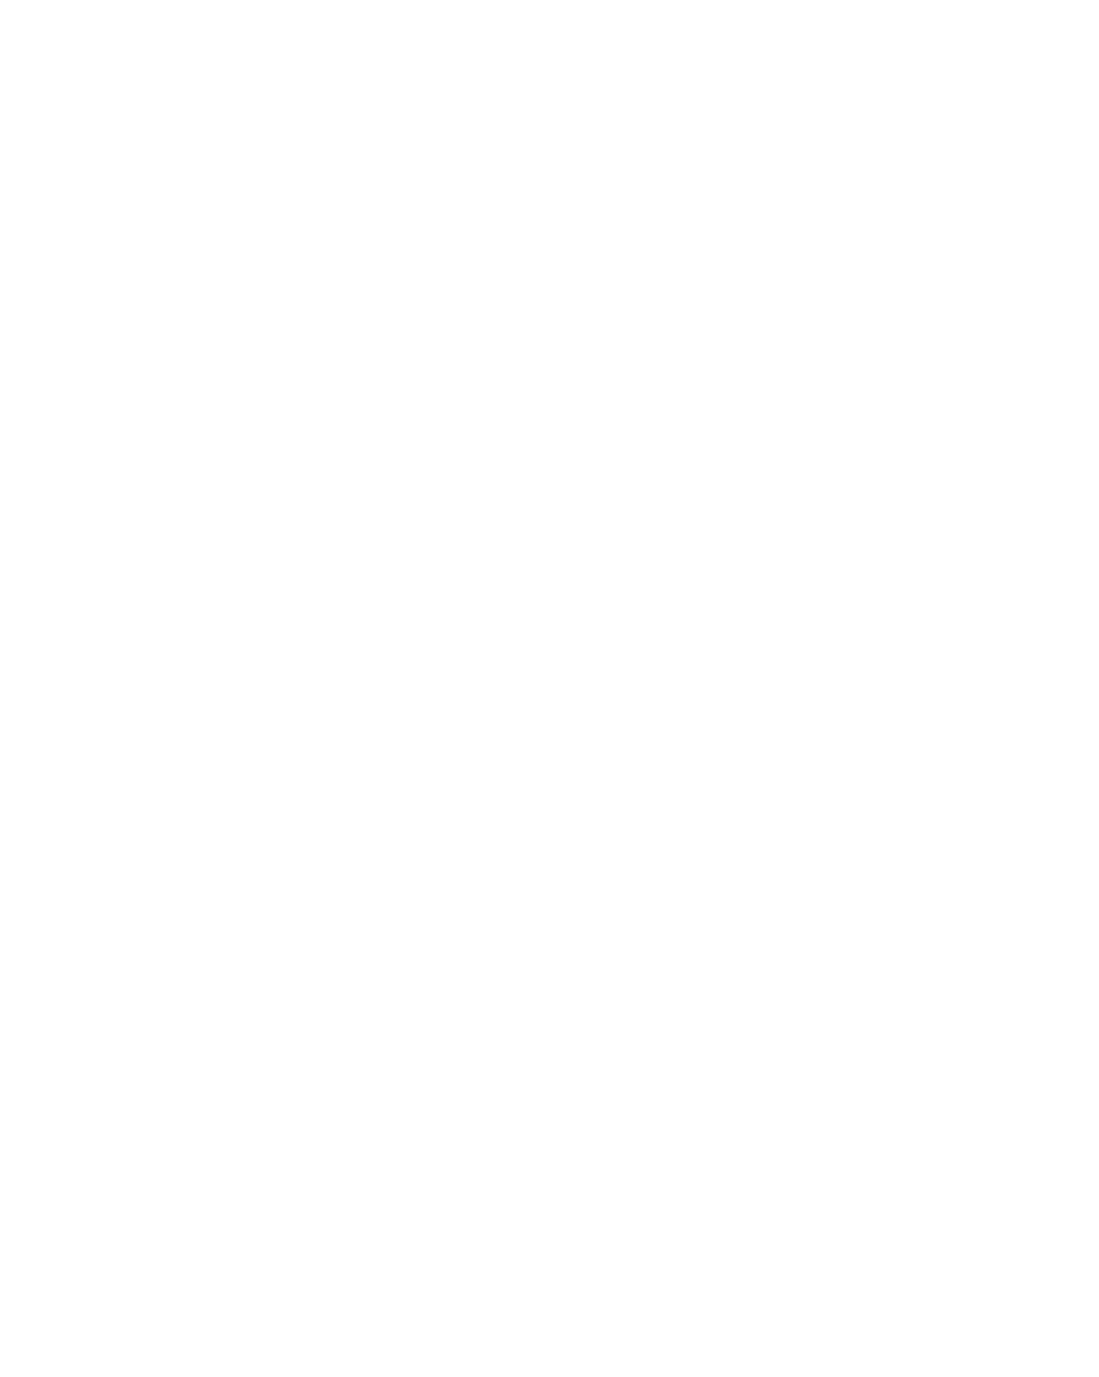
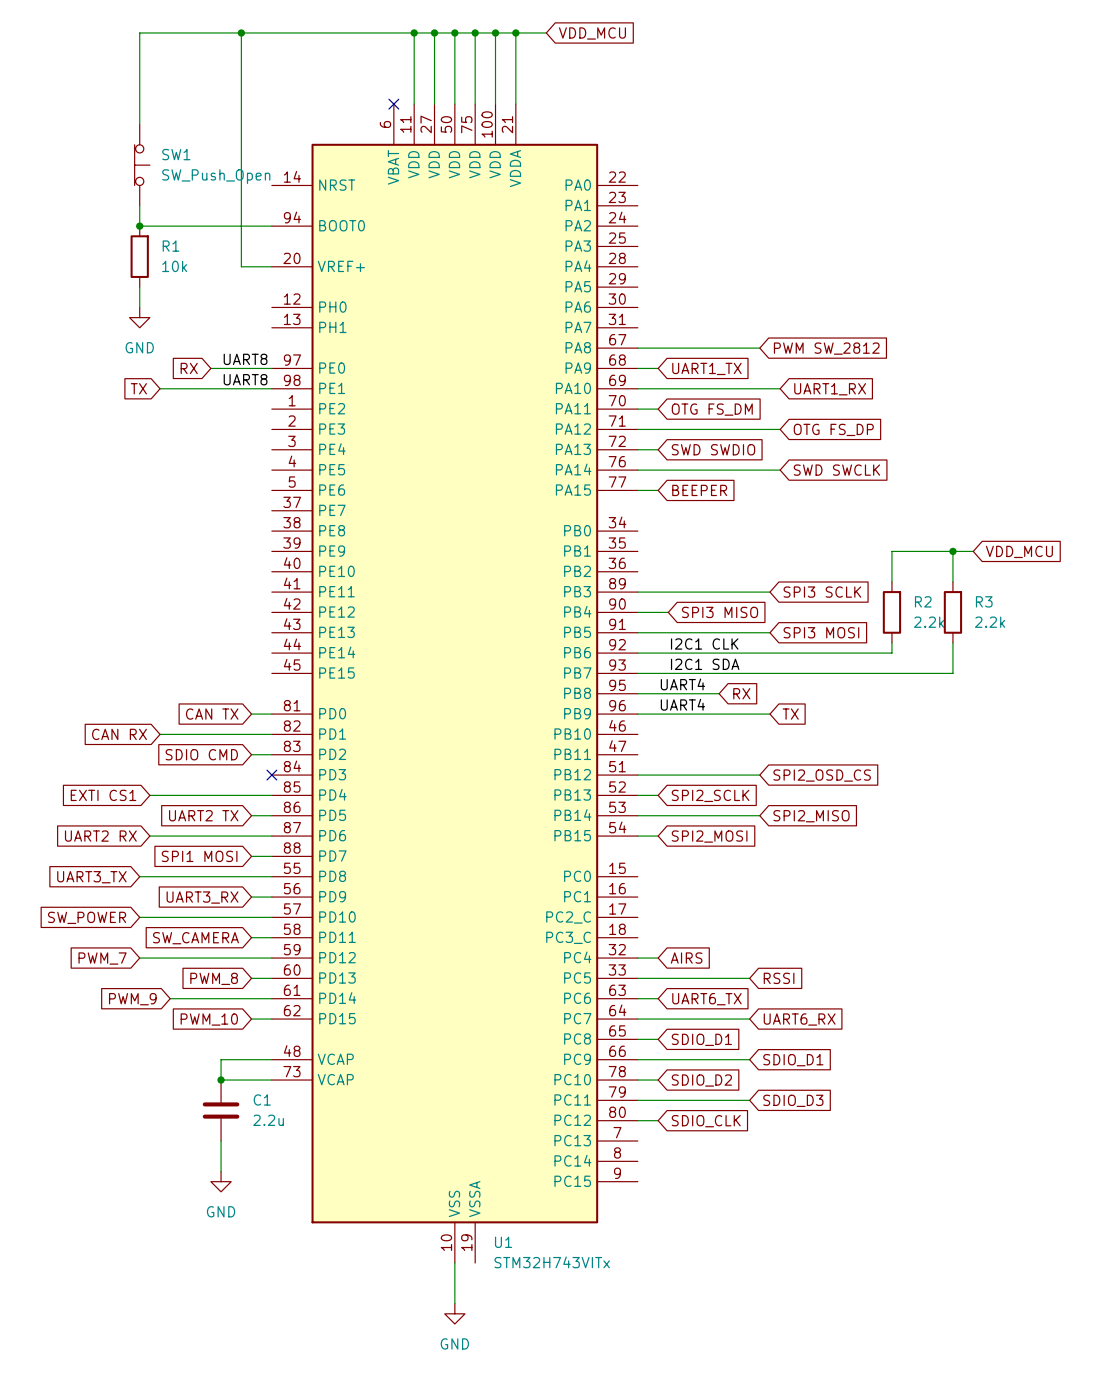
wire: none -> (241, 32) (241, 266) (271, 266)
junction: none -> (241, 32)
wire: none -> (414, 32) (414, 104)
junction: none -> (414, 32)
wire: none -> (434, 32) (434, 104)
junction: none -> (434, 32)
wire: none -> (454, 32) (454, 104)
junction: none -> (454, 32)
wire: none -> (475, 32) (475, 104)
junction: none -> (475, 32)
wire: none -> (495, 32) (495, 104)
junction: none -> (495, 32)
wire: none -> (515, 32) (515, 104)
junction: none -> (515, 32)
wire: none -> (546, 32) (139, 32) (139, 124)
global label: none -> VDD_MCU (592, 33)
no-connect mark: none -> (393, 104)
SW1: none -> SW_Push_Open (142, 165)
wire: none -> (139, 205) (139, 226) (271, 226)
junction: none -> (139, 226)
R1: none -> 10k (139, 256)
wire: none -> (139, 287) (139, 307)
power symbol: none -> GND (139, 317)
wire: none -> (637, 348) (759, 348)
global label: none -> PWM SW_2812 (826, 348)
label: none -> UART8 (245, 359)
global label: none -> RX (189, 368)
wire: none -> (210, 368) (271, 368)
wire: none -> (637, 368) (658, 368)
global label: none -> UART1_TX (706, 368)
label: none -> UART8 (245, 379)
global label: none -> TX (138, 388)
wire: none -> (160, 388) (271, 388)
wire: none -> (637, 388) (780, 388)
global label: none -> UART1_RX (830, 389)
wire: none -> (637, 409) (658, 409)
global label: none -> OTG FS_DM (712, 409)
wire: none -> (637, 429) (780, 429)
global label: none -> OTG FS_DP (833, 429)
wire: none -> (637, 449) (658, 449)
global label: none -> SWD SWDIO (713, 449)
wire: none -> (637, 470) (780, 470)
global label: none -> SWD SWCLK (836, 470)
wire: none -> (637, 490) (658, 490)
global label: none -> BEEPER (699, 490)
wire: none -> (952, 551) (952, 581)
junction: none -> (952, 551)
wire: none -> (973, 551) (891, 551) (891, 581)
global label: none -> VDD_MCU (1019, 551)
wire: none -> (637, 592) (769, 592)
global label: none -> SPI3 SCLK (822, 592)
wire: none -> (637, 612) (668, 612)
global label: none -> SPI3 MISO (720, 612)
R2: none -> 2.2k (891, 612)
R3: none -> 2.2k (952, 612)
wire: none -> (637, 632) (769, 632)
global label: none -> SPI3 MOSI (821, 632)
wire: none -> (891, 642) (891, 653) (637, 653)
wire: none -> (952, 642) (952, 673) (637, 673)
label: none -> I2C1 CLK (704, 644)
label: none -> I2C1 SDA (705, 664)
U1: none -> STM32H743VITx (454, 683)
label: none -> UART4 (682, 684)
wire: none -> (637, 693) (719, 693)
global label: none -> RX (741, 693)
label: none -> UART4 (682, 704)
global label: none -> CAN TX (212, 714)
wire: none -> (251, 714) (271, 714)
wire: none -> (637, 714) (769, 714)
global label: none -> TX (790, 714)
global label: none -> CAN RX (119, 734)
wire: none -> (160, 734) (271, 734)
global label: none -> SDIO CMD (201, 754)
wire: none -> (251, 754) (271, 754)
no-connect mark: none -> (271, 775)
wire: none -> (637, 775) (759, 775)
global label: none -> SPI2_OSD_CS (822, 775)
global label: none -> EXTI CS1 (103, 795)
wire: none -> (149, 795) (271, 795)
wire: none -> (637, 795) (658, 795)
global label: none -> SPI2_SCLK (710, 795)
global label: none -> UART2 TX (203, 815)
wire: none -> (251, 815) (271, 815)
wire: none -> (637, 815) (759, 815)
global label: none -> SPI2_MISO (811, 816)
global label: none -> UART2 RX (100, 836)
wire: none -> (149, 836) (271, 836)
wire: none -> (637, 836) (658, 836)
global label: none -> SPI2_MOSI (709, 836)
global label: none -> SPI1 MOSI (199, 856)
wire: none -> (251, 856) (271, 856)
wire: none -> (139, 876) (271, 876)
global label: none -> UART3_TX (91, 877)
global label: none -> UART3_RX (202, 897)
wire: none -> (251, 897) (271, 897)
global label: none -> SW_POWER (87, 917)
wire: none -> (139, 917) (271, 917)
wire: none -> (251, 937) (271, 937)
global label: none -> SW_CAMERA (195, 938)
global label: none -> PWM_7 (102, 958)
wire: none -> (139, 958) (271, 958)
wire: none -> (637, 958) (658, 958)
global label: none -> AIRS (686, 958)
global label: none -> PWM_8 (214, 978)
wire: none -> (251, 978) (271, 978)
wire: none -> (637, 978) (749, 978)
global label: none -> RSSI (779, 978)
wire: none -> (170, 998) (271, 998)
wire: none -> (637, 998) (658, 998)
global label: none -> PWM_9 (132, 999)
global label: none -> UART6_TX (706, 999)
global label: none -> PWM_10 (209, 1019)
wire: none -> (251, 1019) (271, 1019)
wire: none -> (637, 1019) (749, 1019)
global label: none -> UART6_RX (799, 1019)
wire: none -> (637, 1039) (658, 1039)
global label: none -> SDIO_D1 (701, 1039)
wire: none -> (271, 1059) (221, 1059) (221, 1080) (271, 1080)
wire: none -> (637, 1059) (749, 1059)
global label: none -> SDIO_D1 (793, 1060)
junction: none -> (221, 1080)
wire: none -> (637, 1080) (658, 1080)
global label: none -> SDIO_D2 (701, 1080)
wire: none -> (637, 1100) (749, 1100)
global label: none -> SDIO_D3 (793, 1100)
C1: none -> 2.2u (221, 1110)
wire: none -> (637, 1120) (658, 1120)
global label: none -> SDIO_CLK (706, 1121)
wire: none -> (221, 1141) (221, 1171)
power symbol: none -> GND (221, 1181)
wire: none -> (454, 1263) (454, 1303)
power symbol: none -> GND (454, 1313)

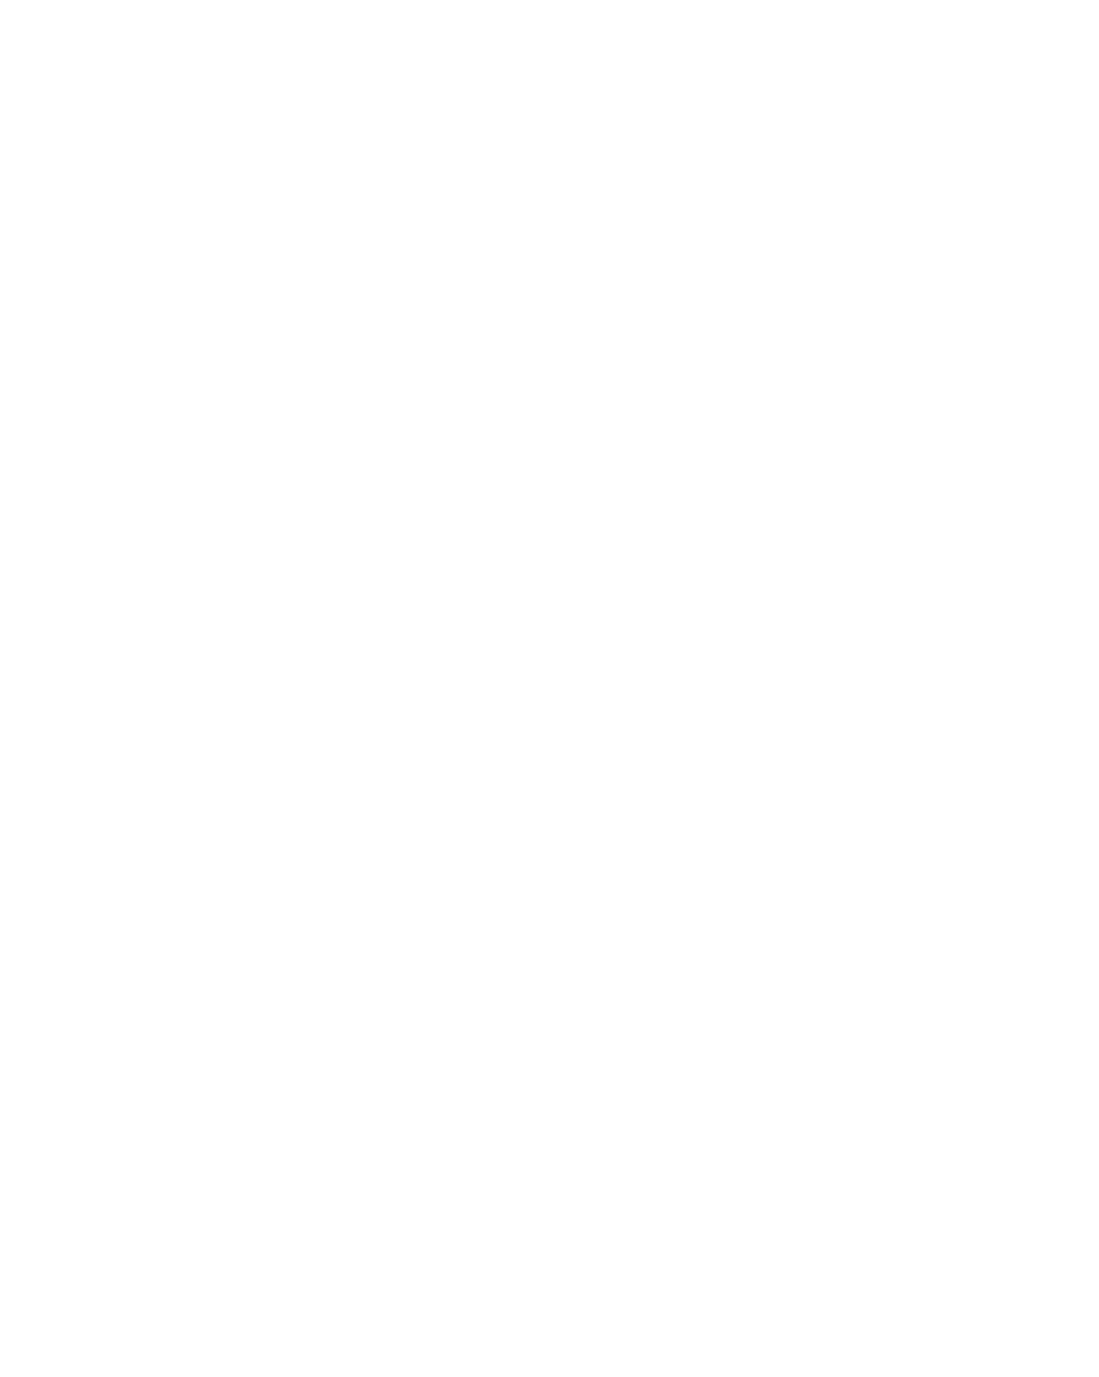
wire: (241, 32) (241, 266) (271, 266) -> none
junction: (241, 32) -> none
wire: (414, 32) (414, 104) -> none
junction: (414, 32) -> none
wire: (434, 32) (434, 104) -> none
junction: (434, 32) -> none
wire: (454, 32) (454, 104) -> none
junction: (454, 32) -> none
wire: (475, 32) (475, 104) -> none
junction: (475, 32) -> none
wire: (495, 32) (495, 104) -> none
junction: (495, 32) -> none
wire: (515, 32) (515, 104) -> none
junction: (515, 32) -> none
wire: (546, 32) (139, 32) (139, 124) -> none
global label: VDD_MCU (592, 33) -> none
no-connect mark: (393, 104) -> none
SW1: SW_Push_Open (142, 165) -> none
wire: (139, 205) (139, 226) (271, 226) -> none
junction: (139, 226) -> none
R1: 10k (139, 256) -> none
wire: (139, 287) (139, 307) -> none
power symbol: GND (139, 317) -> none
wire: (637, 348) (759, 348) -> none
global label: PWM SW_2812 (826, 348) -> none
label: UART8 (245, 359) -> none
global label: RX (189, 368) -> none
wire: (210, 368) (271, 368) -> none
wire: (637, 368) (658, 368) -> none
global label: UART1_TX (706, 368) -> none
label: UART8 (245, 379) -> none
global label: TX (138, 388) -> none
wire: (160, 388) (271, 388) -> none
wire: (637, 388) (780, 388) -> none
global label: UART1_RX (830, 389) -> none
wire: (637, 409) (658, 409) -> none
global label: OTG FS_DM (712, 409) -> none
wire: (637, 429) (780, 429) -> none
global label: OTG FS_DP (833, 429) -> none
wire: (637, 449) (658, 449) -> none
global label: SWD SWDIO (713, 449) -> none
wire: (637, 470) (780, 470) -> none
global label: SWD SWCLK (836, 470) -> none
wire: (637, 490) (658, 490) -> none
global label: BEEPER (699, 490) -> none
wire: (952, 551) (952, 581) -> none
junction: (952, 551) -> none
wire: (973, 551) (891, 551) (891, 581) -> none
global label: VDD_MCU (1019, 551) -> none
wire: (637, 592) (769, 592) -> none
global label: SPI3 SCLK (822, 592) -> none
wire: (637, 612) (668, 612) -> none
global label: SPI3 MISO (720, 612) -> none
R2: 2.2k (891, 612) -> none
R3: 2.2k (952, 612) -> none
wire: (637, 632) (769, 632) -> none
global label: SPI3 MOSI (821, 632) -> none
wire: (891, 642) (891, 653) (637, 653) -> none
wire: (952, 642) (952, 673) (637, 673) -> none
label: I2C1 CLK (704, 644) -> none
label: I2C1 SDA (705, 664) -> none
U1: STM32H743VITx (454, 683) -> none
label: UART4 (682, 684) -> none
wire: (637, 693) (719, 693) -> none
global label: RX (741, 693) -> none
label: UART4 (682, 704) -> none
global label: CAN TX (212, 714) -> none
wire: (251, 714) (271, 714) -> none
wire: (637, 714) (769, 714) -> none
global label: TX (790, 714) -> none
global label: CAN RX (119, 734) -> none
wire: (160, 734) (271, 734) -> none
global label: SDIO CMD (201, 754) -> none
wire: (251, 754) (271, 754) -> none
no-connect mark: (271, 775) -> none
wire: (637, 775) (759, 775) -> none
global label: SPI2_OSD_CS (822, 775) -> none
global label: EXTI CS1 (103, 795) -> none
wire: (149, 795) (271, 795) -> none
wire: (637, 795) (658, 795) -> none
global label: SPI2_SCLK (710, 795) -> none
global label: UART2 TX (203, 815) -> none
wire: (251, 815) (271, 815) -> none
wire: (637, 815) (759, 815) -> none
global label: SPI2_MISO (811, 816) -> none
global label: UART2 RX (100, 836) -> none
wire: (149, 836) (271, 836) -> none
wire: (637, 836) (658, 836) -> none
global label: SPI2_MOSI (709, 836) -> none
global label: SPI1 MOSI (199, 856) -> none
wire: (251, 856) (271, 856) -> none
wire: (139, 876) (271, 876) -> none
global label: UART3_TX (91, 877) -> none
global label: UART3_RX (202, 897) -> none
wire: (251, 897) (271, 897) -> none
global label: SW_POWER (87, 917) -> none
wire: (139, 917) (271, 917) -> none
wire: (251, 937) (271, 937) -> none
global label: SW_CAMERA (195, 938) -> none
global label: PWM_7 (102, 958) -> none
wire: (139, 958) (271, 958) -> none
wire: (637, 958) (658, 958) -> none
global label: AIRS (686, 958) -> none
global label: PWM_8 (214, 978) -> none
wire: (251, 978) (271, 978) -> none
wire: (637, 978) (749, 978) -> none
global label: RSSI (779, 978) -> none
wire: (170, 998) (271, 998) -> none
wire: (637, 998) (658, 998) -> none
global label: PWM_9 (132, 999) -> none
global label: UART6_TX (706, 999) -> none
global label: PWM_10 (209, 1019) -> none
wire: (251, 1019) (271, 1019) -> none
wire: (637, 1019) (749, 1019) -> none
global label: UART6_RX (799, 1019) -> none
wire: (637, 1039) (658, 1039) -> none
global label: SDIO_D1 (701, 1039) -> none
wire: (271, 1059) (221, 1059) (221, 1080) (271, 1080) -> none
wire: (637, 1059) (749, 1059) -> none
global label: SDIO_D1 (793, 1060) -> none
junction: (221, 1080) -> none
wire: (637, 1080) (658, 1080) -> none
global label: SDIO_D2 (701, 1080) -> none
wire: (637, 1100) (749, 1100) -> none
global label: SDIO_D3 (793, 1100) -> none
C1: 2.2u (221, 1110) -> none
wire: (637, 1120) (658, 1120) -> none
global label: SDIO_CLK (706, 1121) -> none
wire: (221, 1141) (221, 1171) -> none
power symbol: GND (221, 1181) -> none
wire: (454, 1263) (454, 1303) -> none
power symbol: GND (454, 1313) -> none

